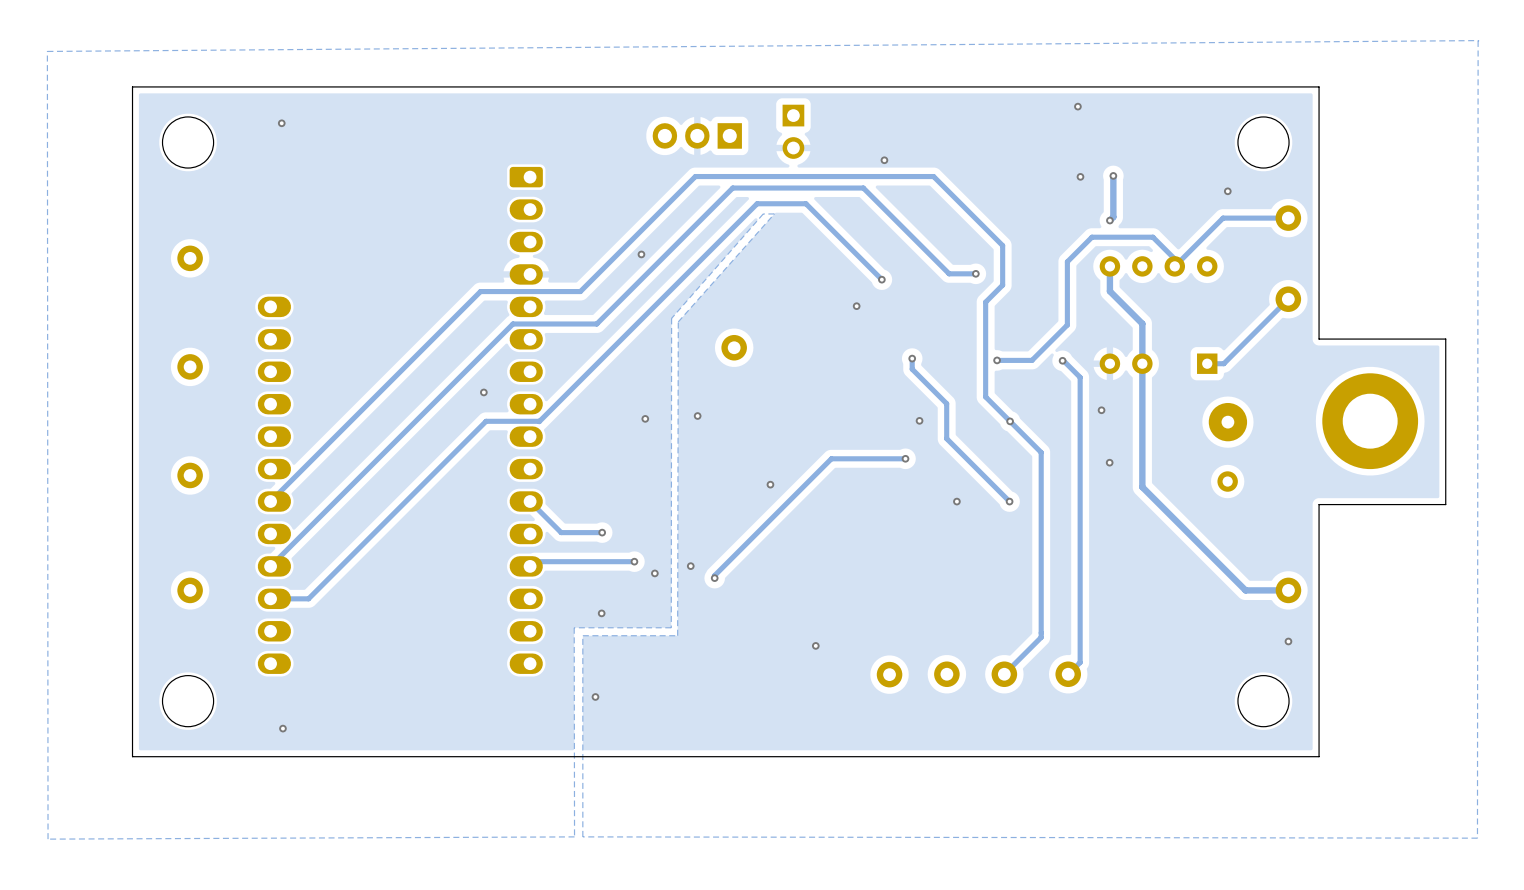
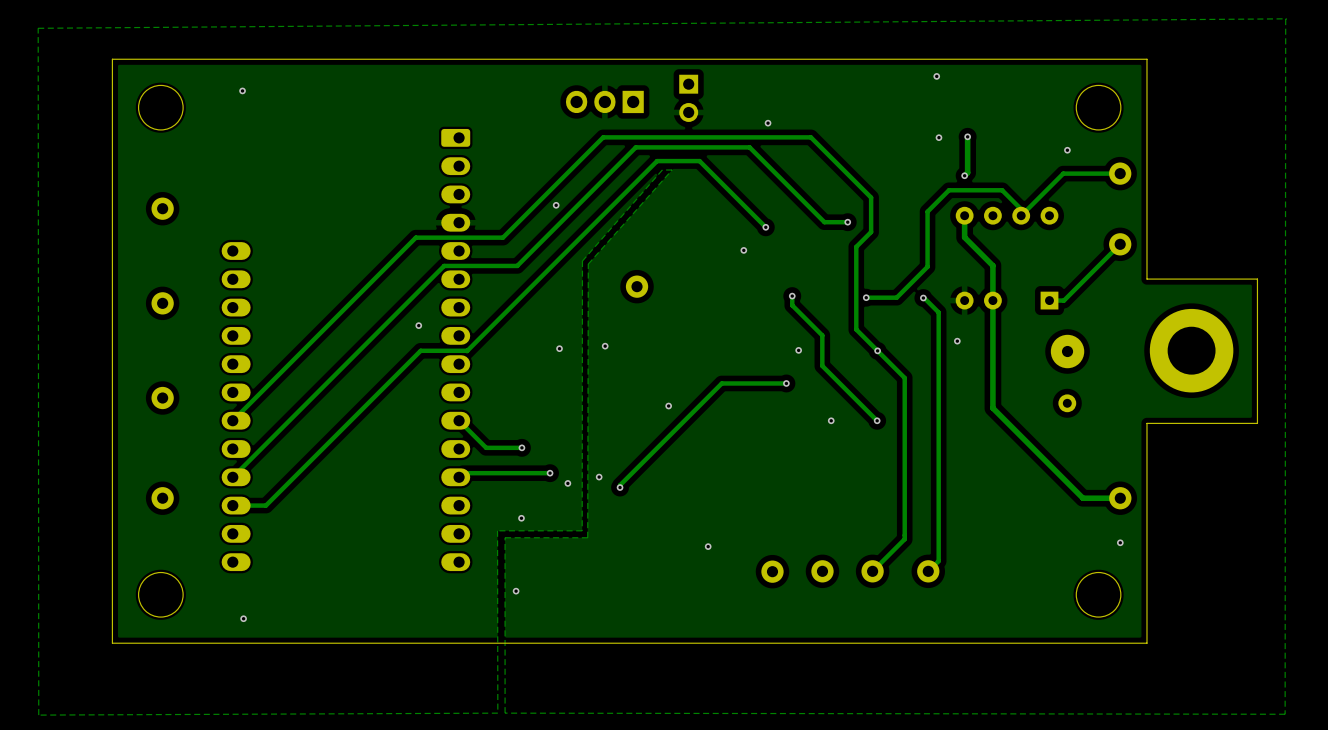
via: (1109, 462) -> none

